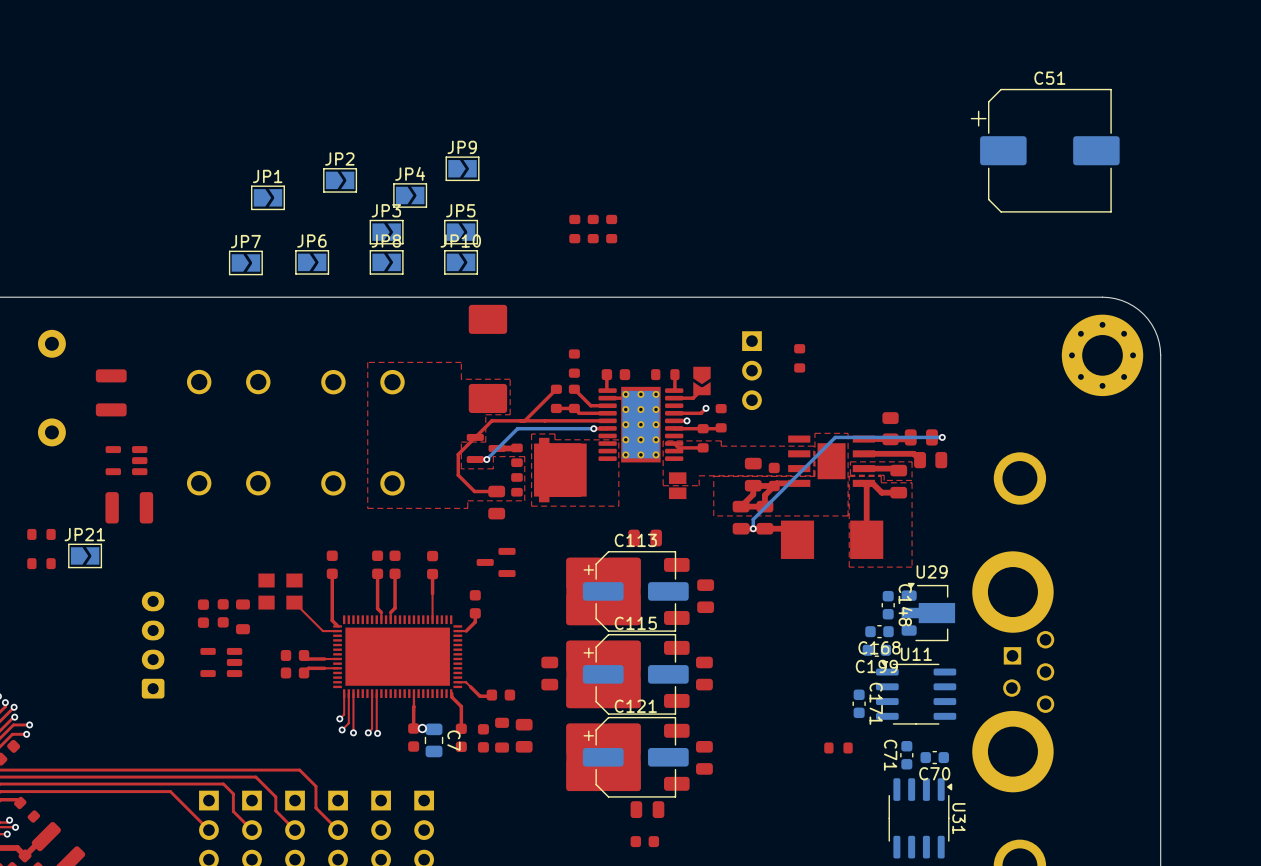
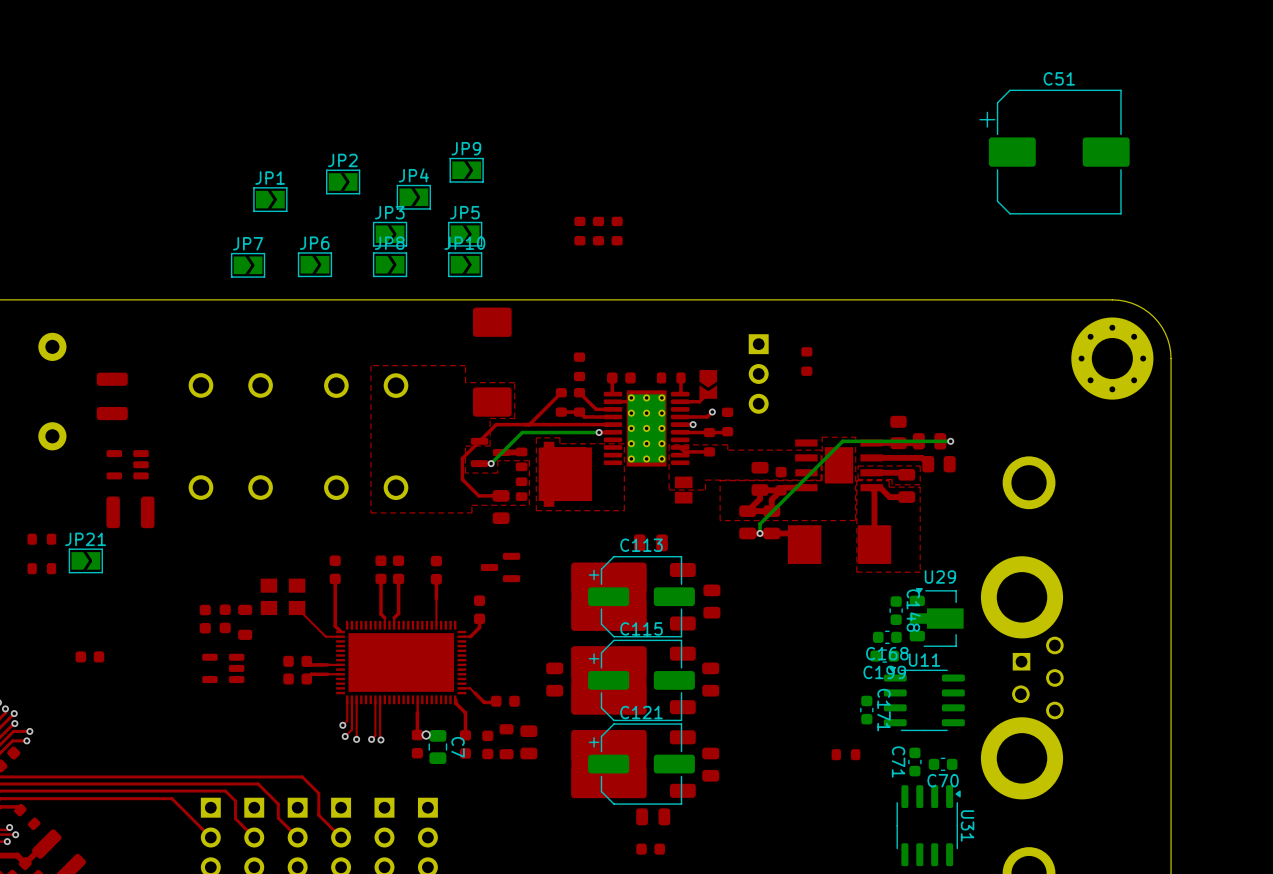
part: (153, 645) -> none
part: none -> (89, 656)

